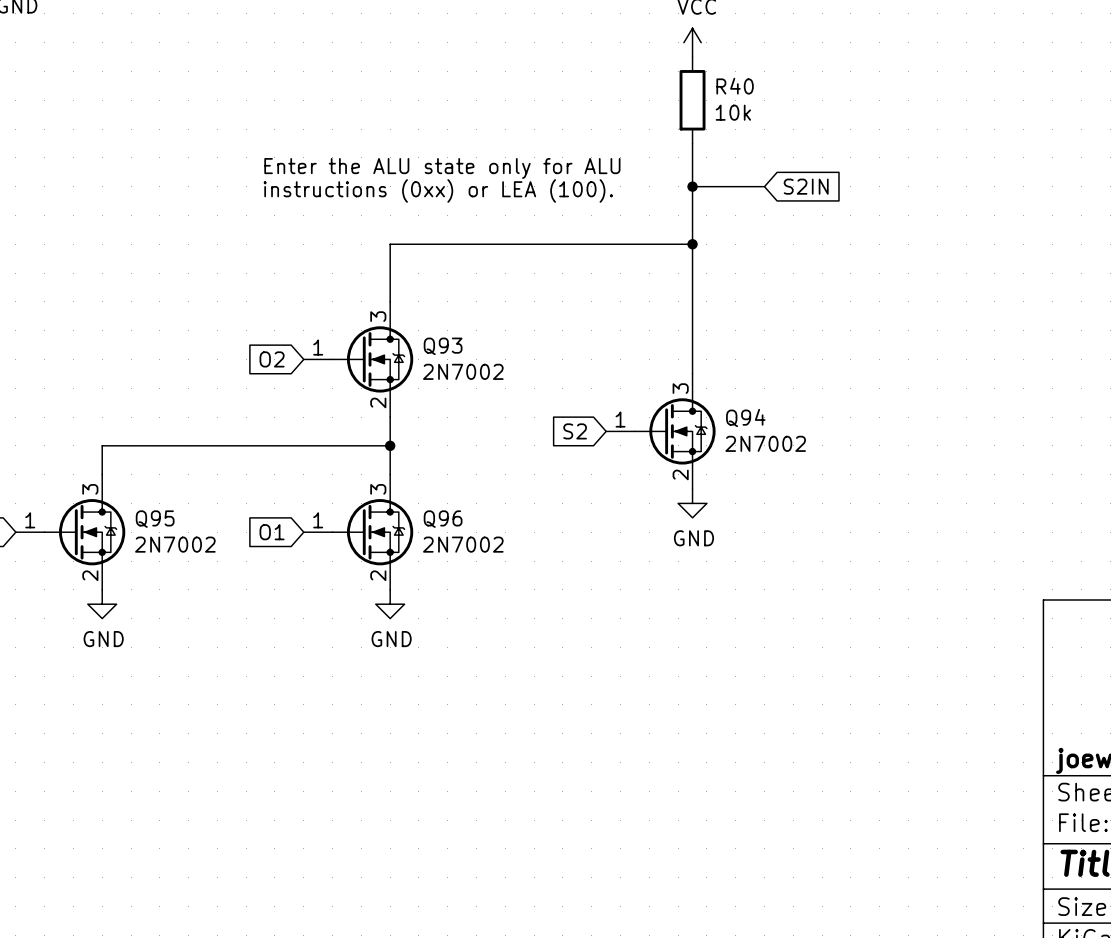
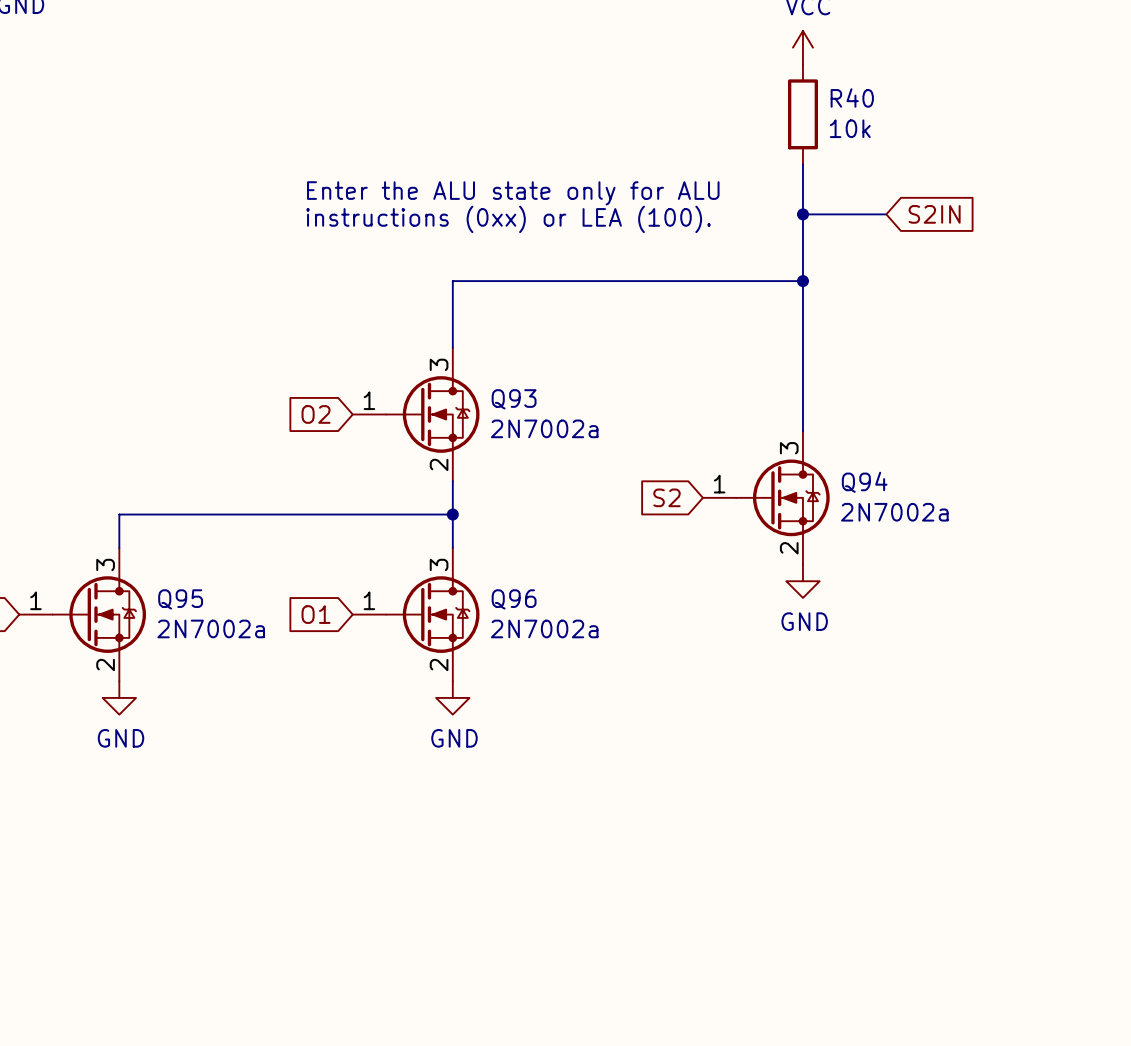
Q93 value: 2N7002 (463, 371) -> 2N7002a (544, 428)
Q94 value: 2N7002 (765, 443) -> 2N7002a (894, 512)
Q95 value: 2N7002 (175, 544) -> 2N7002a (211, 628)
Q96 value: 2N7002 (463, 544) -> 2N7002a (544, 628)

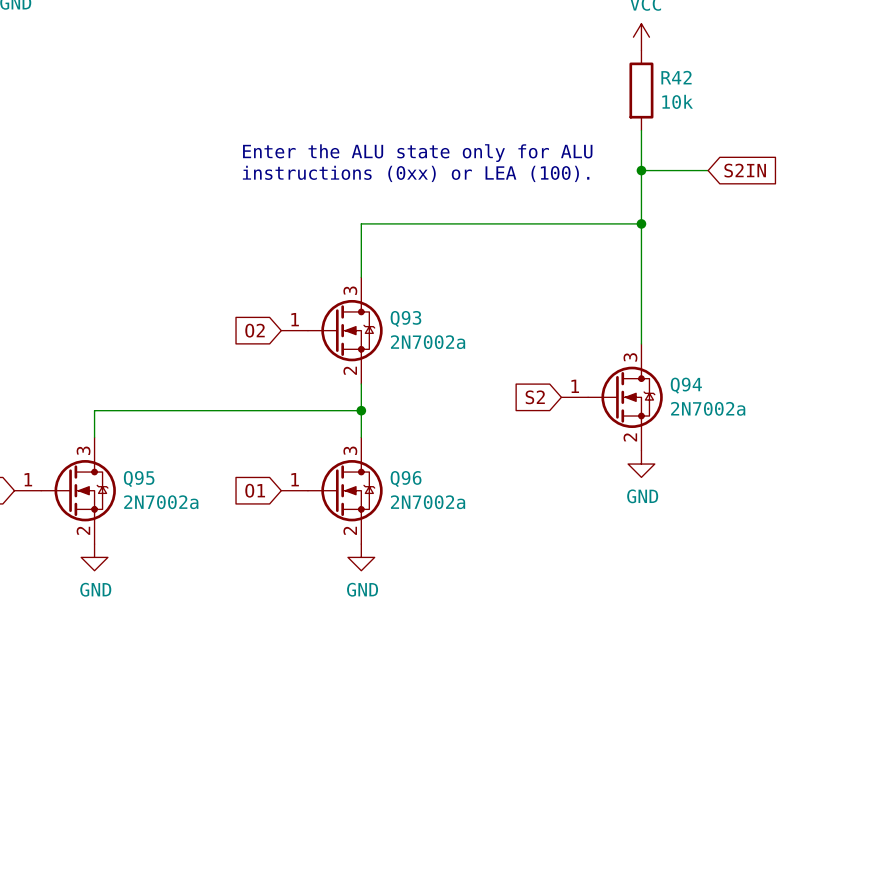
R40 name: R40 (852, 97) -> R42 (676, 77)

